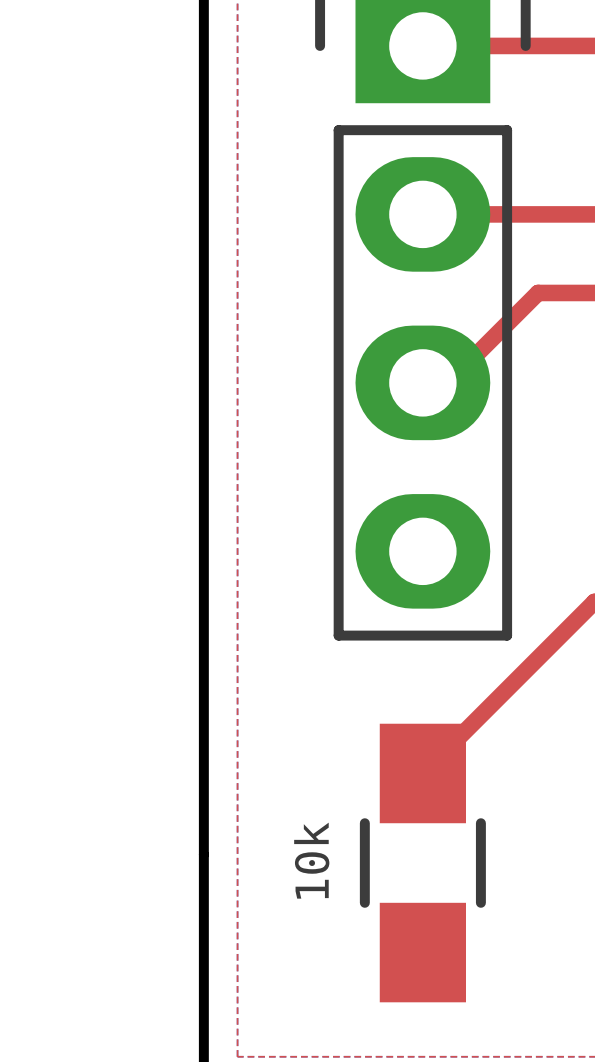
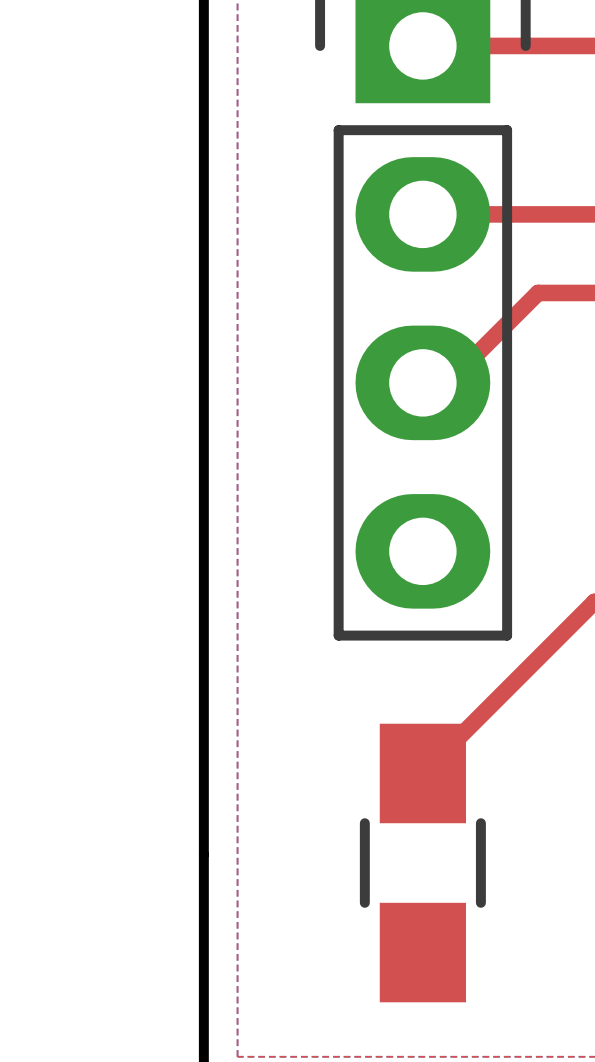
part value: 10k (311, 860) -> none

